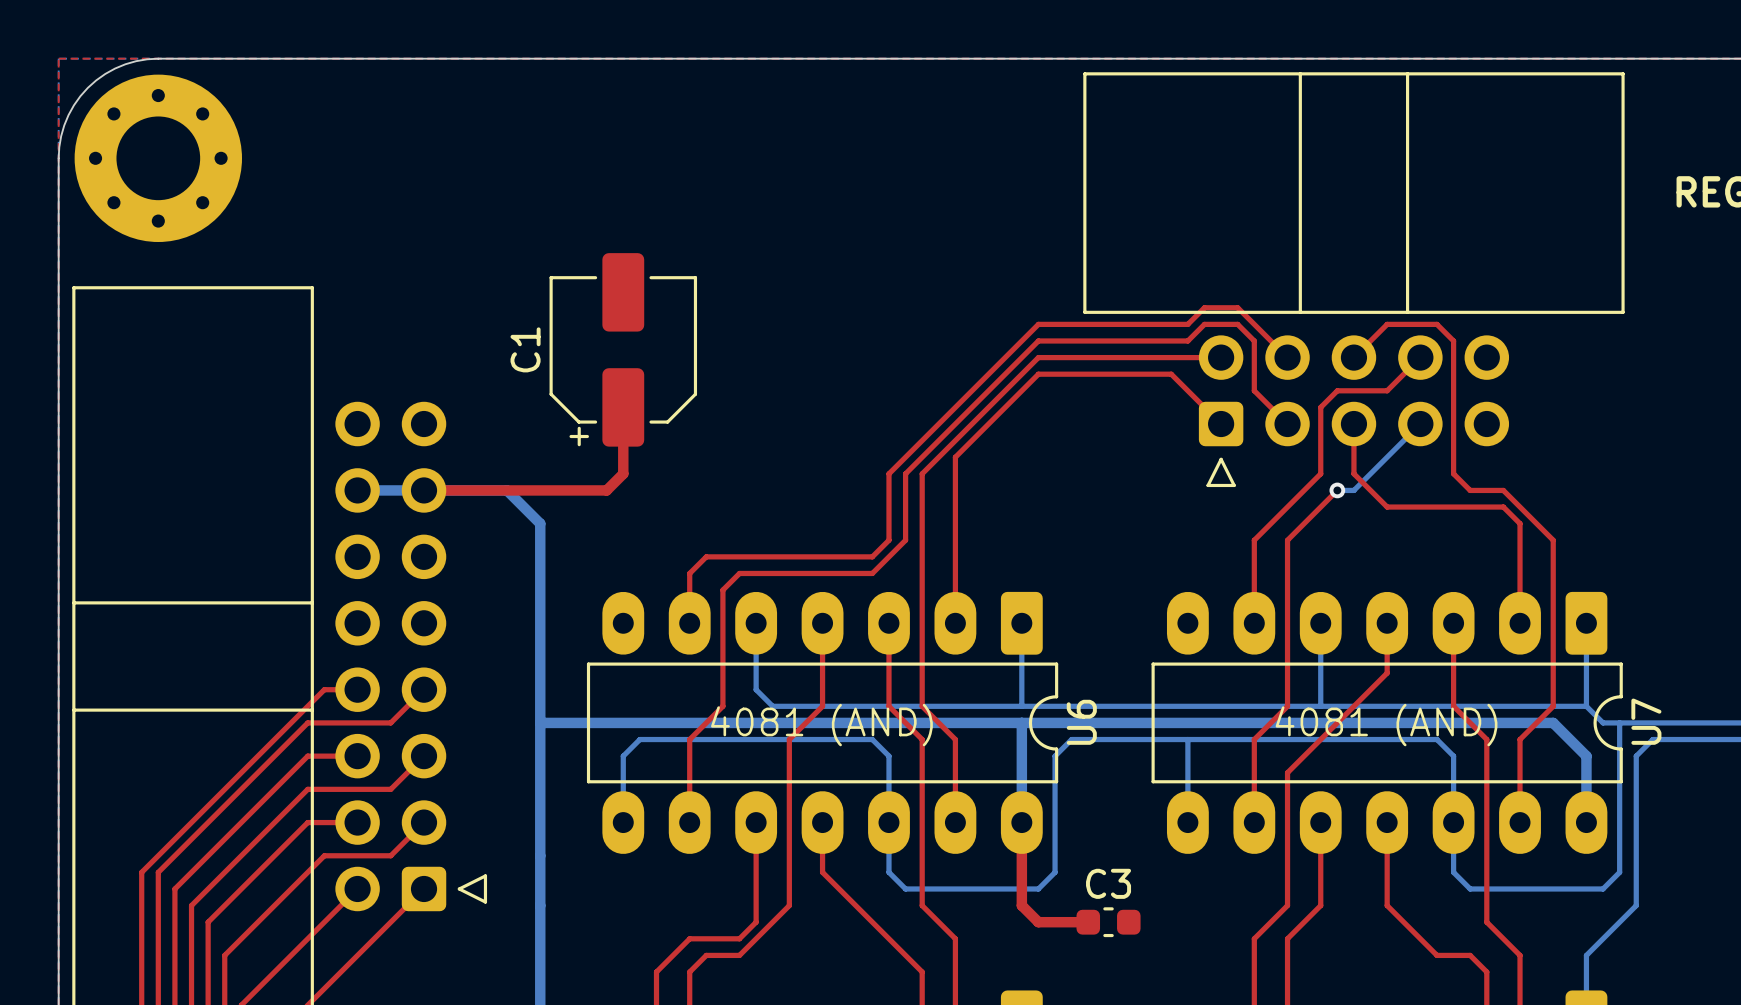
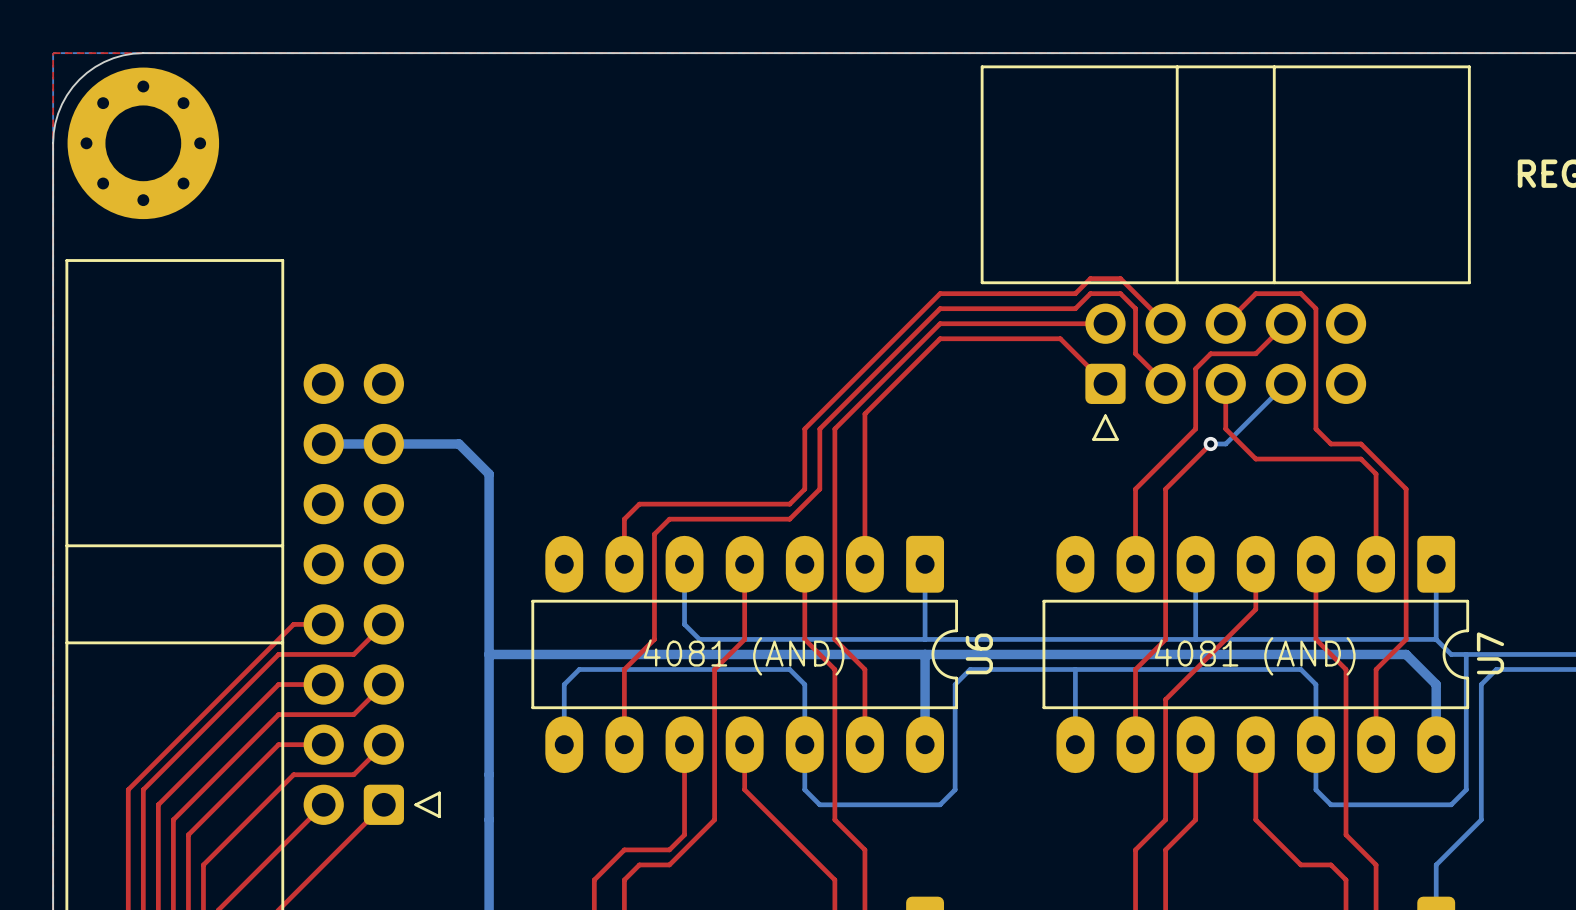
C1: (623, 349) -> none
top track: (623, 407) (623, 473) (606, 490) (424, 490) -> none
top track: (1021, 822) (1021, 905) (1038, 922) (1088, 922) -> none
C3: (1108, 922) -> none

